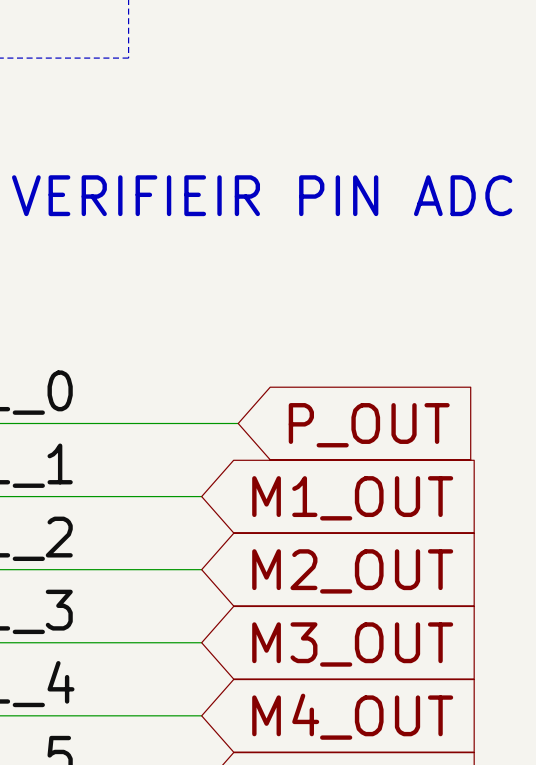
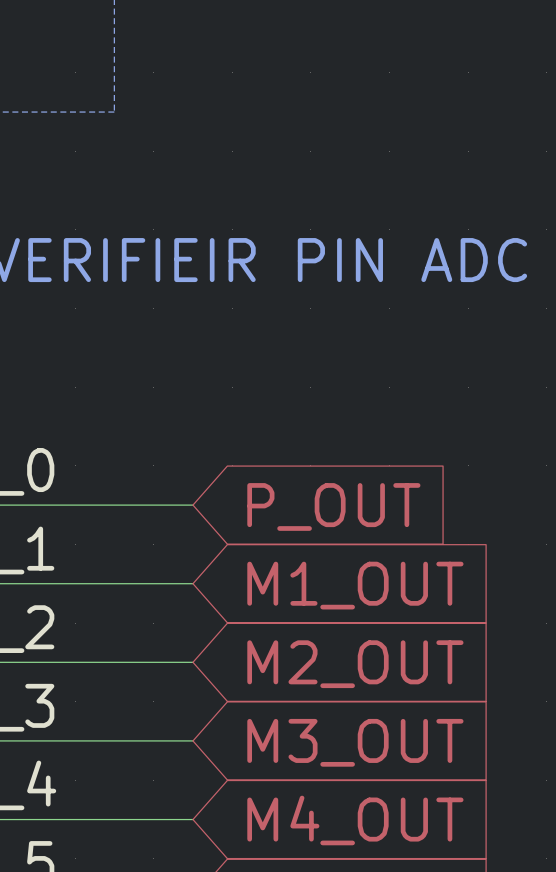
wire: (201, 423) (238, 423) -> none
global label position: P_OUT (369, 425) -> P_OUT (333, 506)

